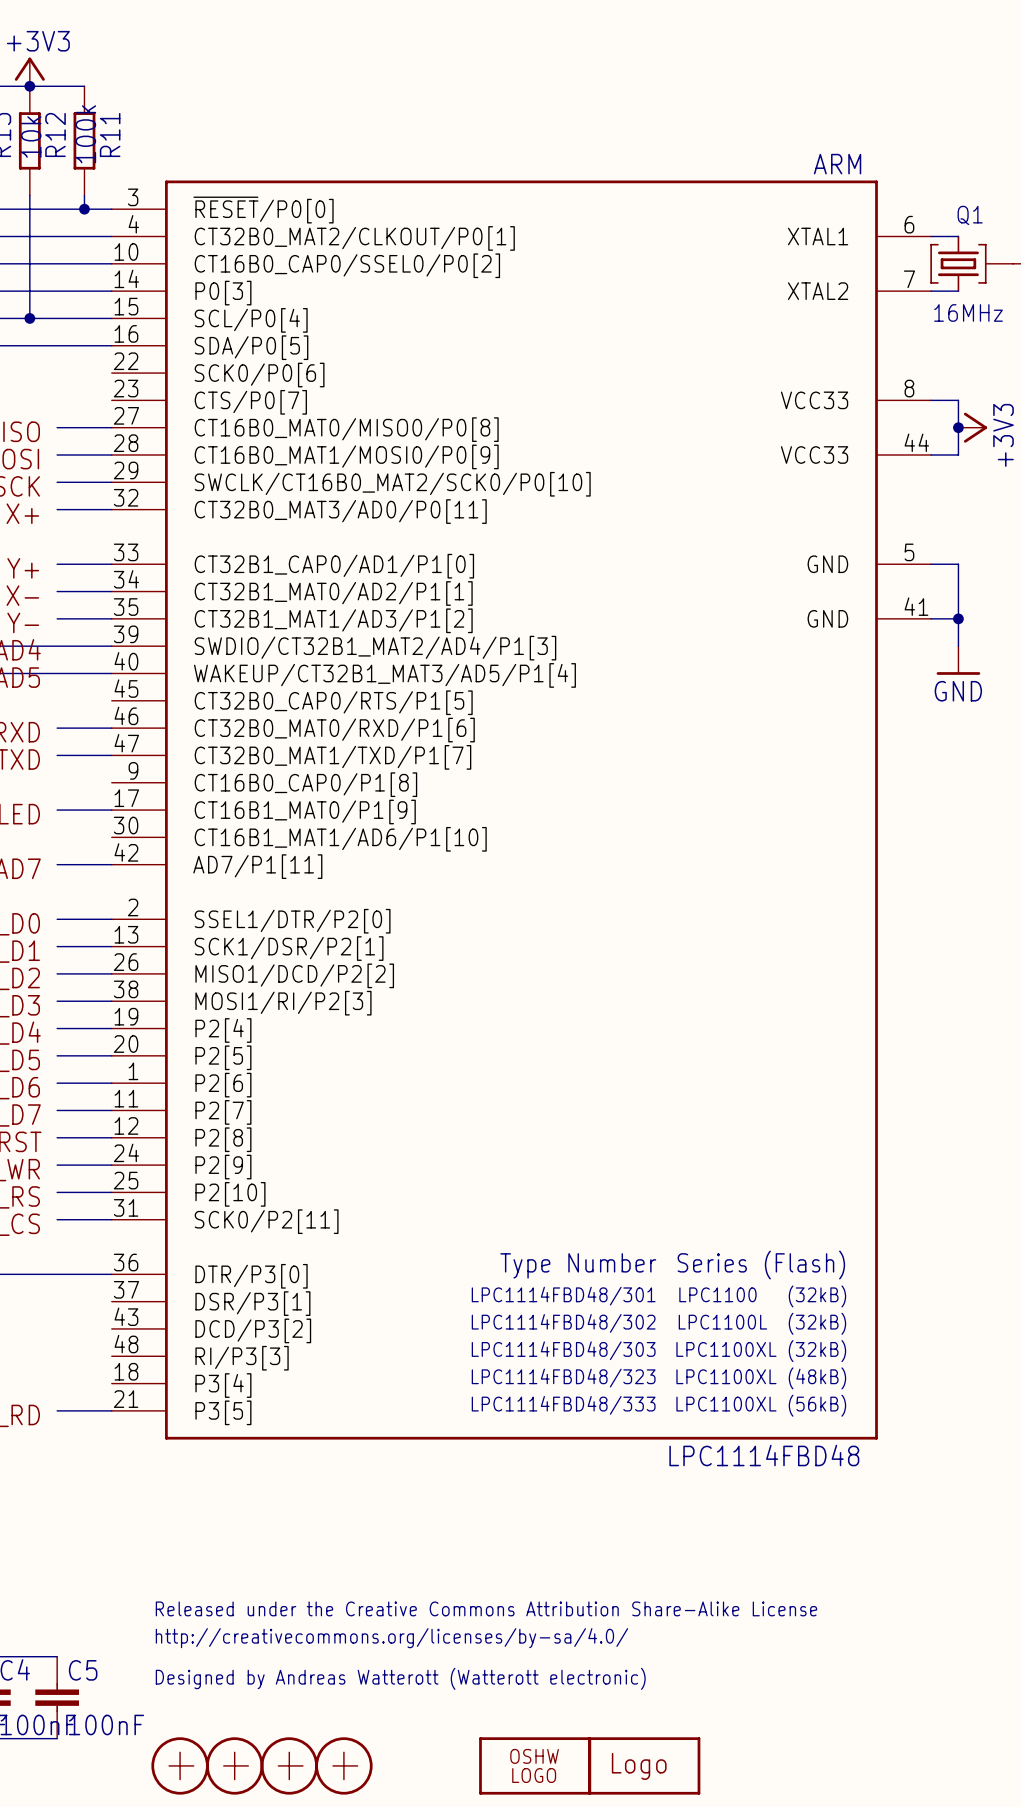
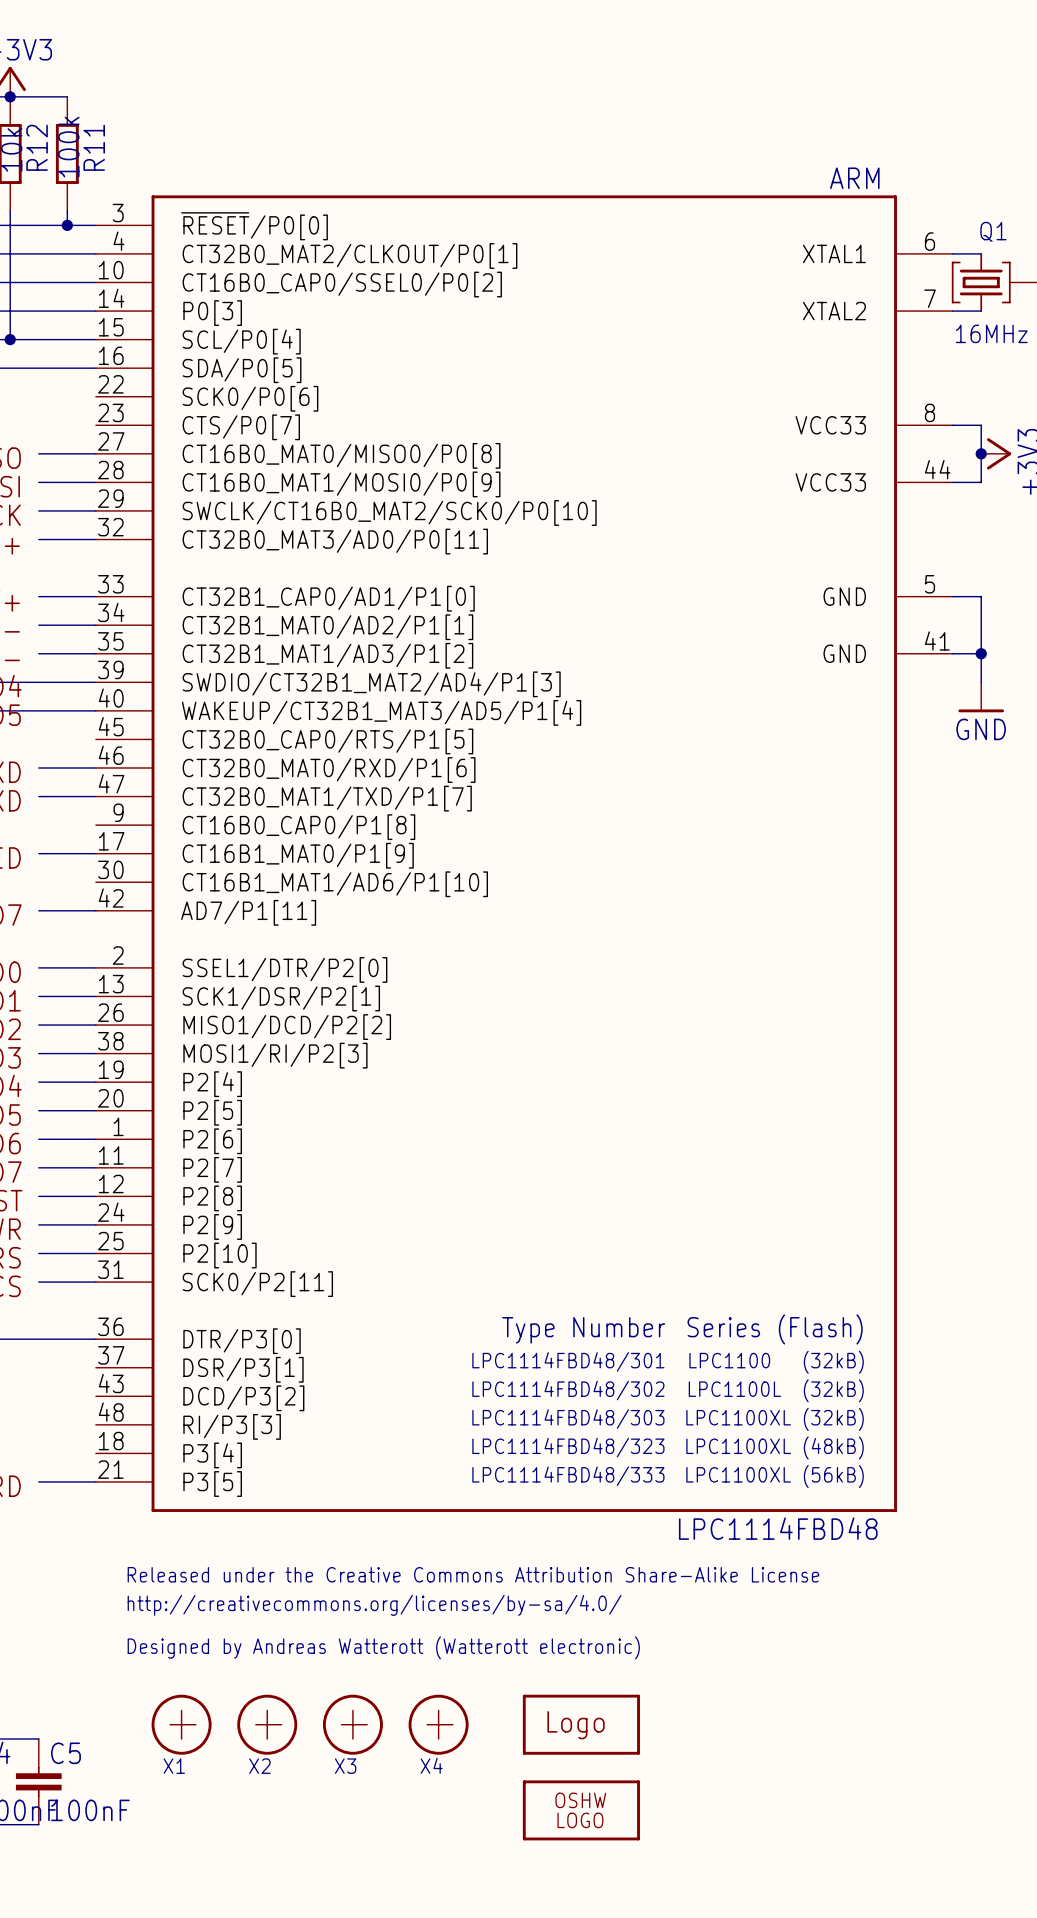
text position: Released under the Creative Commons Attribution Share-Alike License (486, 1608) -> Released under the Creative Commons Attribution Share-Alike License (473, 1574)
text position: http://creativecommons.org/licenses/by-sa/4.0/ (391, 1638) -> http://creativecommons.org/licenses/by-sa/4.0/ (374, 1605)
X1: none -> (181, 1724)
X2: none -> (267, 1724)
X3: none -> (352, 1724)
X4: none -> (438, 1724)
text position: Designed by Andreas Watterott (Watterott electronic) (400, 1678) -> Designed by Andreas Watterott (Watterott electronic) (383, 1647)
part: (180, 1765) -> none
part: (234, 1765) -> none
part: (289, 1765) -> none
part: (343, 1765) -> none
part position: (535, 1765) -> (581, 1810)
part position: (644, 1765) -> (581, 1724)

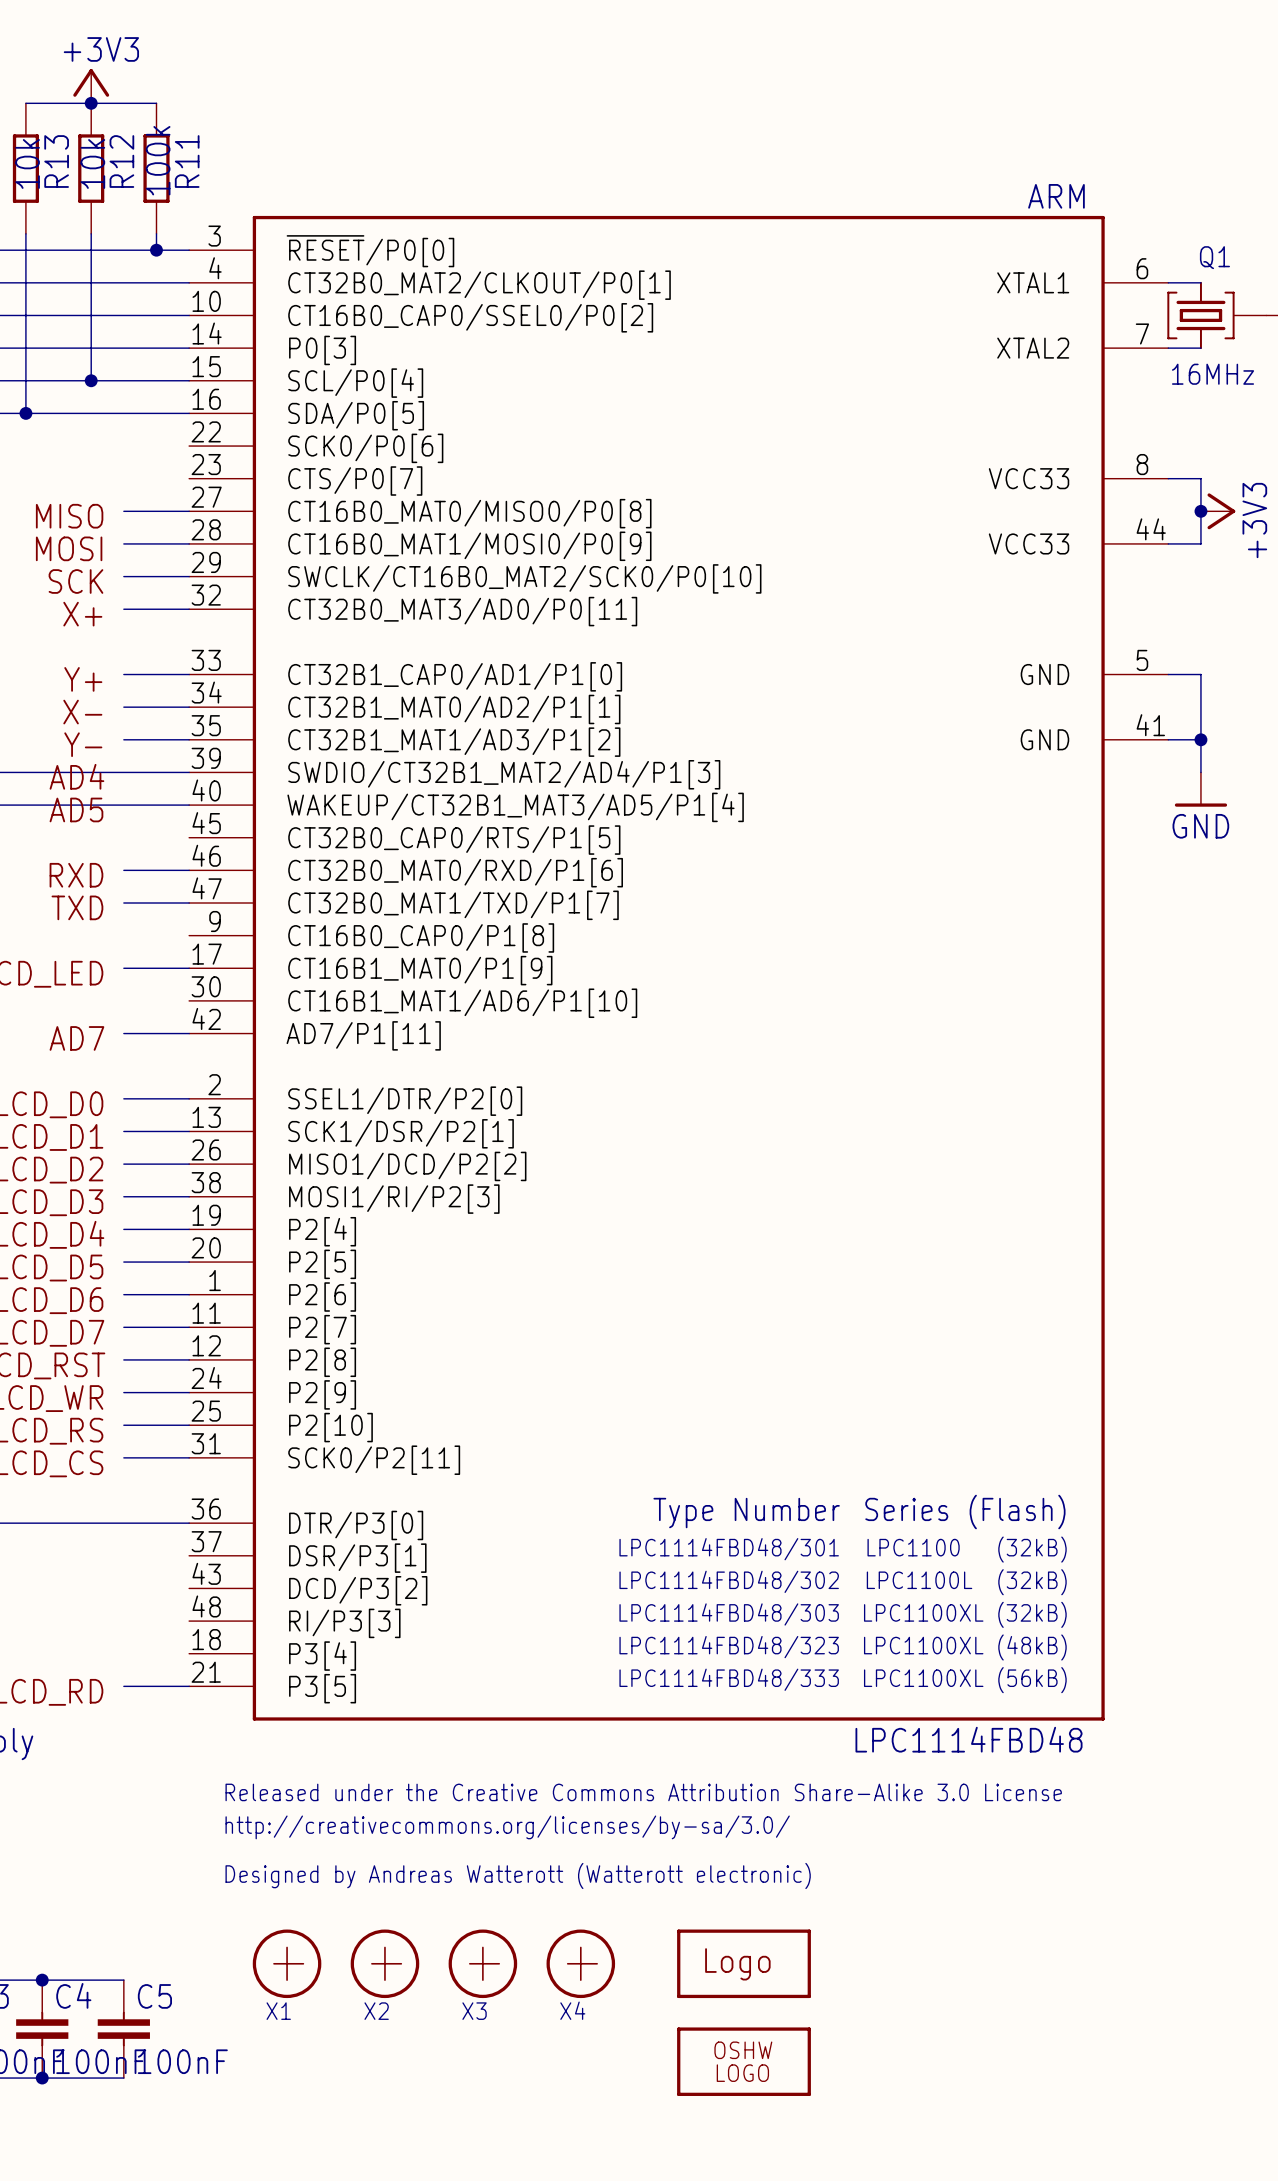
text: Released under the Creative Commons Attribution Share-Alike License (473, 1574) -> Released under the Creative Commons Attribution Share-Alike 3.0 License (643, 1792)
text: http://creativecommons.org/licenses/by-sa/4.0/ (374, 1605) -> http://creativecommons.org/licenses/by-sa/3.0/ (507, 1827)

